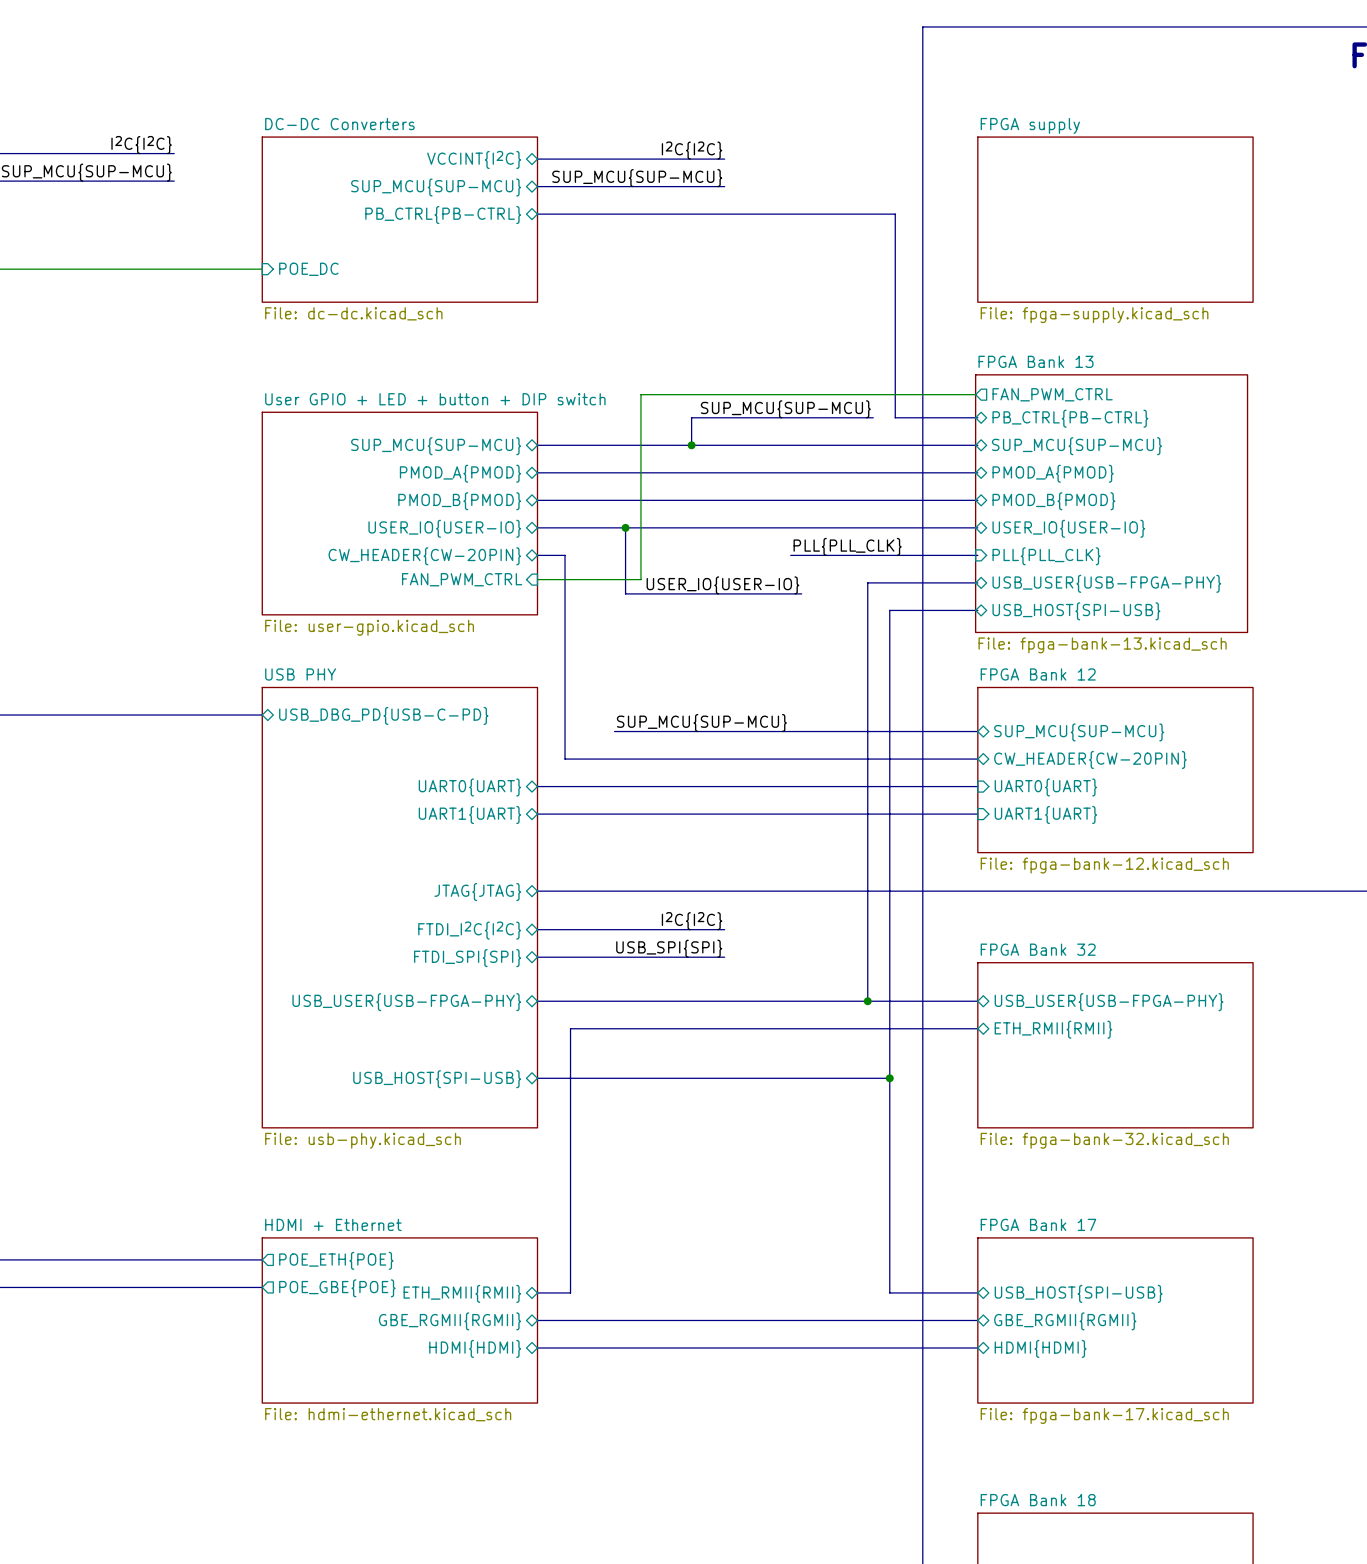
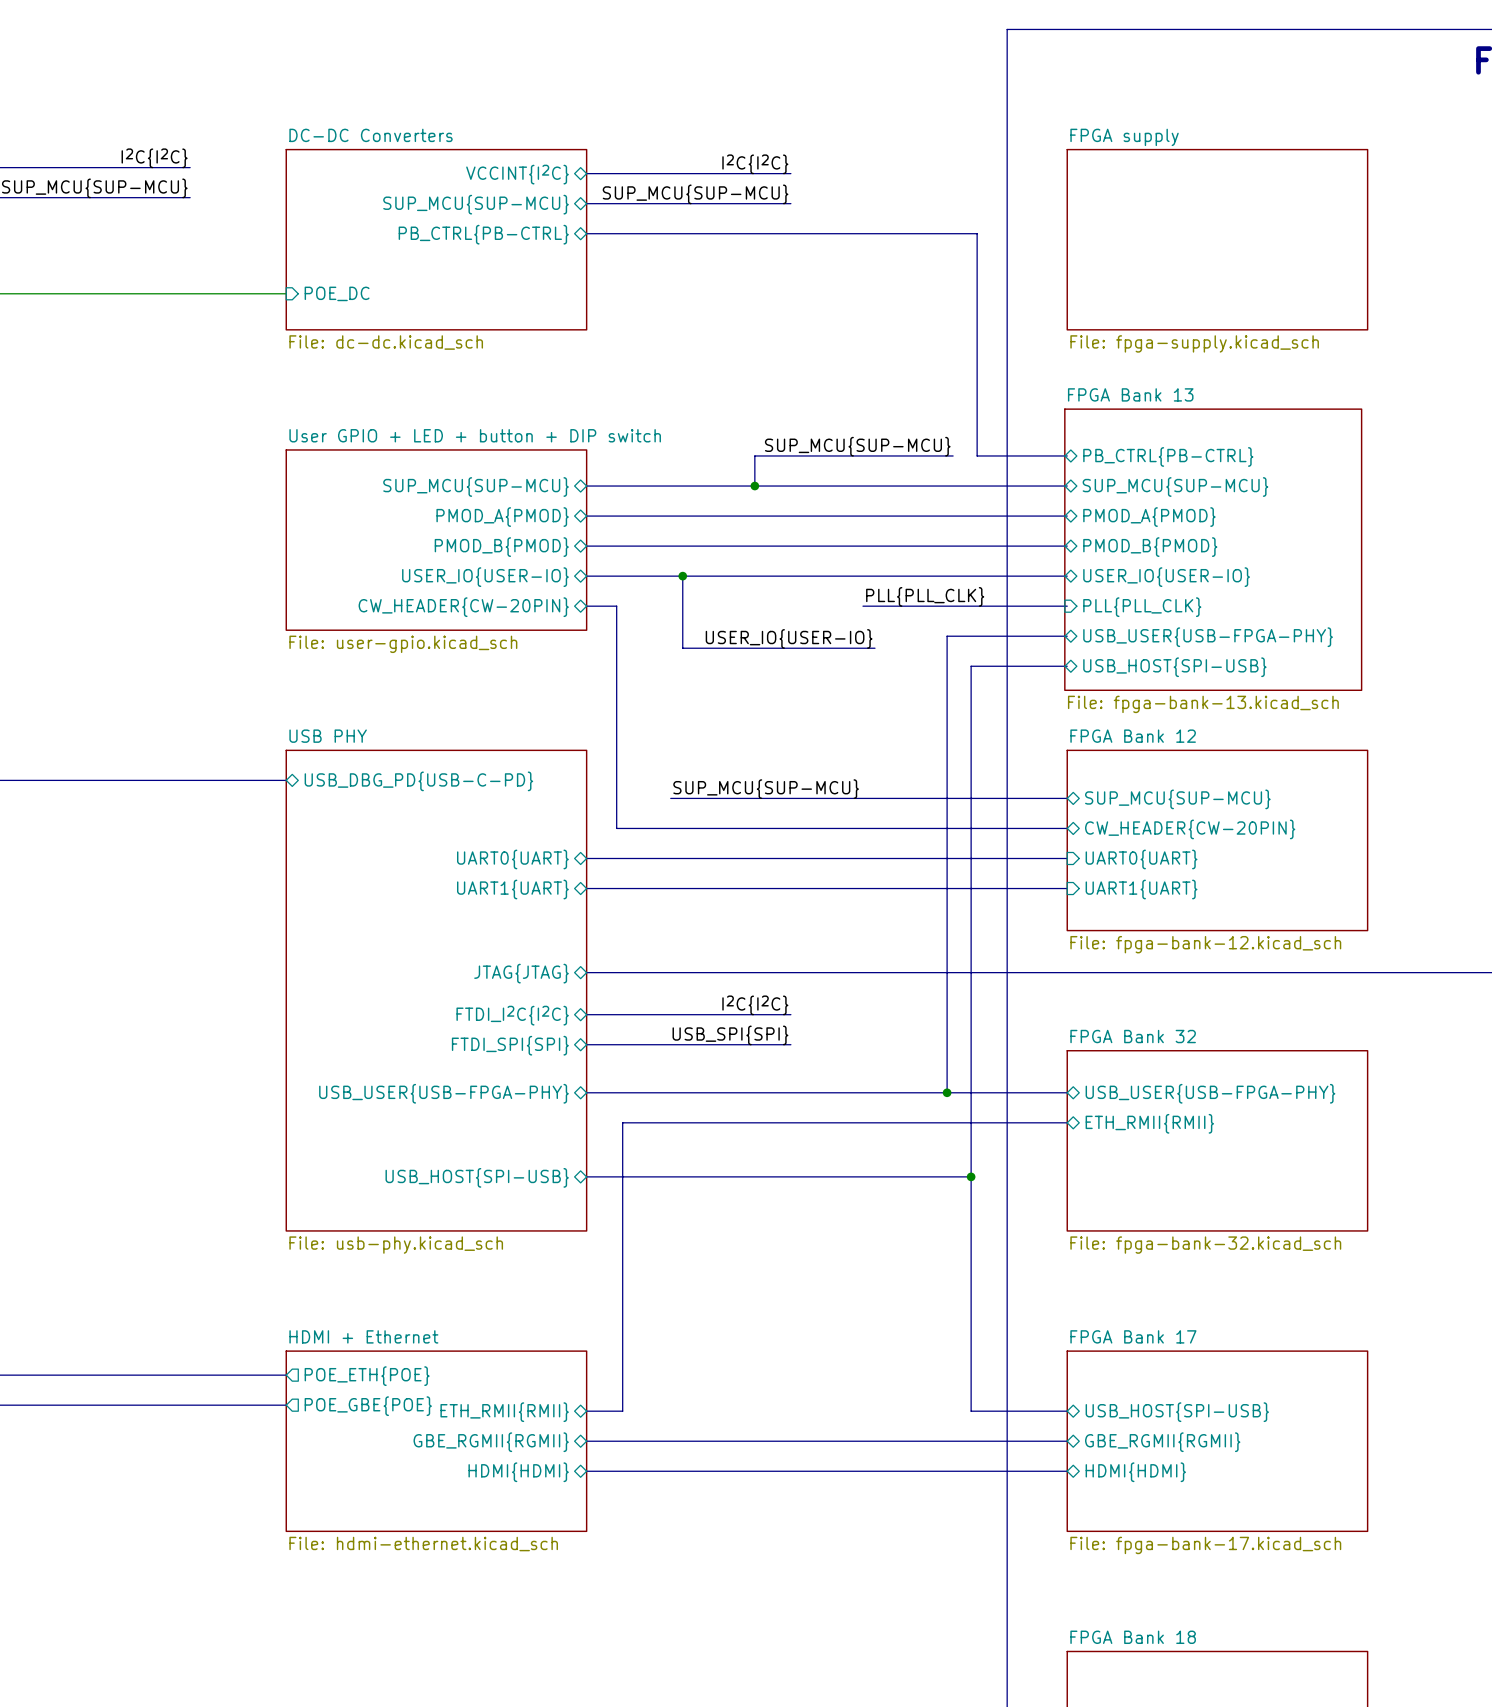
wire: (975, 394) (640, 394) (640, 579) (537, 579) -> none
sheet pin: FAN_PWM_CTRL (1052, 394) -> none
sheet User GPIO + LED + button + DIP switch: none -> File: user-gpio.kicad_sch (436, 540)
sheet User GPIO + LED + button + DIP switch: File: user-gpio.kicad_sch (399, 513) -> none
sheet pin: FAN_PWM_CTRL (462, 579) -> none

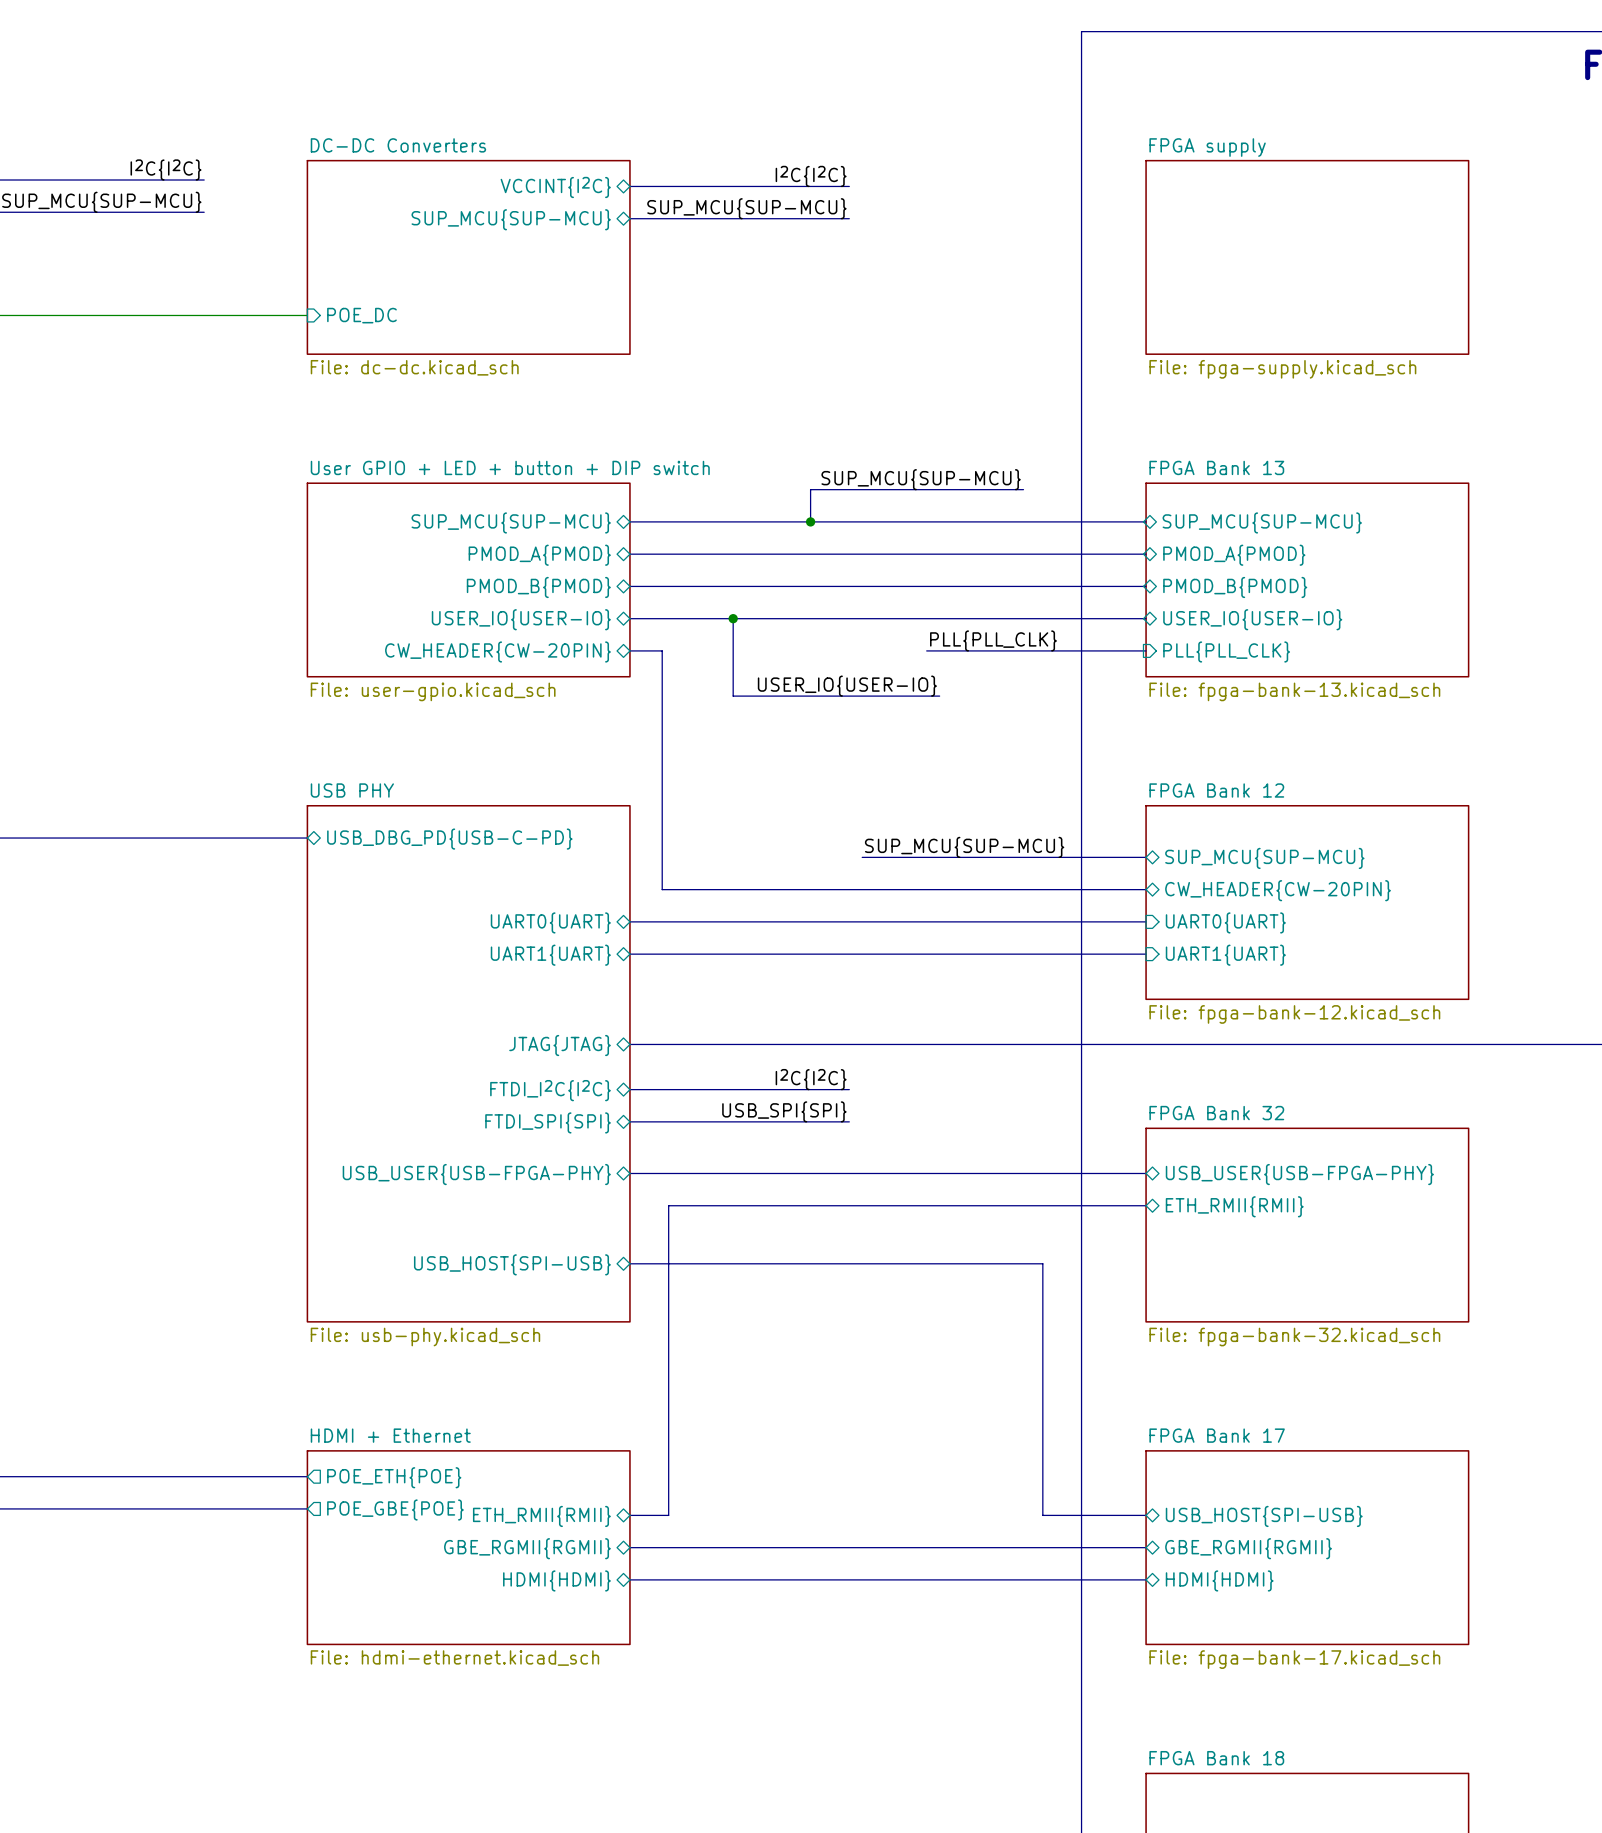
bus: (586, 233) (977, 233) (977, 455) (1067, 455) -> none
sheet pin: PB_CTRL{PB-CTRL} (483, 234) -> none
sheet FPGA Bank 13 name position: FPGA Bank 13 (1130, 394) -> FPGA Bank 13 (1216, 467)
sheet FPGA Bank 13 shape: [1064, 408, 1363, 692] -> [1145, 482, 1470, 678]
sheet pin: PB_CTRL{PB-CTRL} (1168, 456) -> none
bus: (1067, 636) (947, 636) (947, 1092) -> none
sheet pin: USB_USER{USB-FPGA-PHY} (1208, 637) -> none
bus: (1067, 666) (971, 666) (971, 1176) -> none
sheet pin: USB_HOST{SPI-USB} (1174, 667) -> none
sheet FPGA Bank 13 value position: File: fpga-bank-13.kicad_sch (1203, 704) -> File: fpga-bank-13.kicad_sch (1294, 691)
label position: SUP_MCU{SUP-MCU} (766, 789) -> SUP_MCU{SUP-MCU} (964, 847)
bus: (670, 798) (802, 798) -> none
junction: (947, 1092) -> none
junction: (971, 1176) -> none

